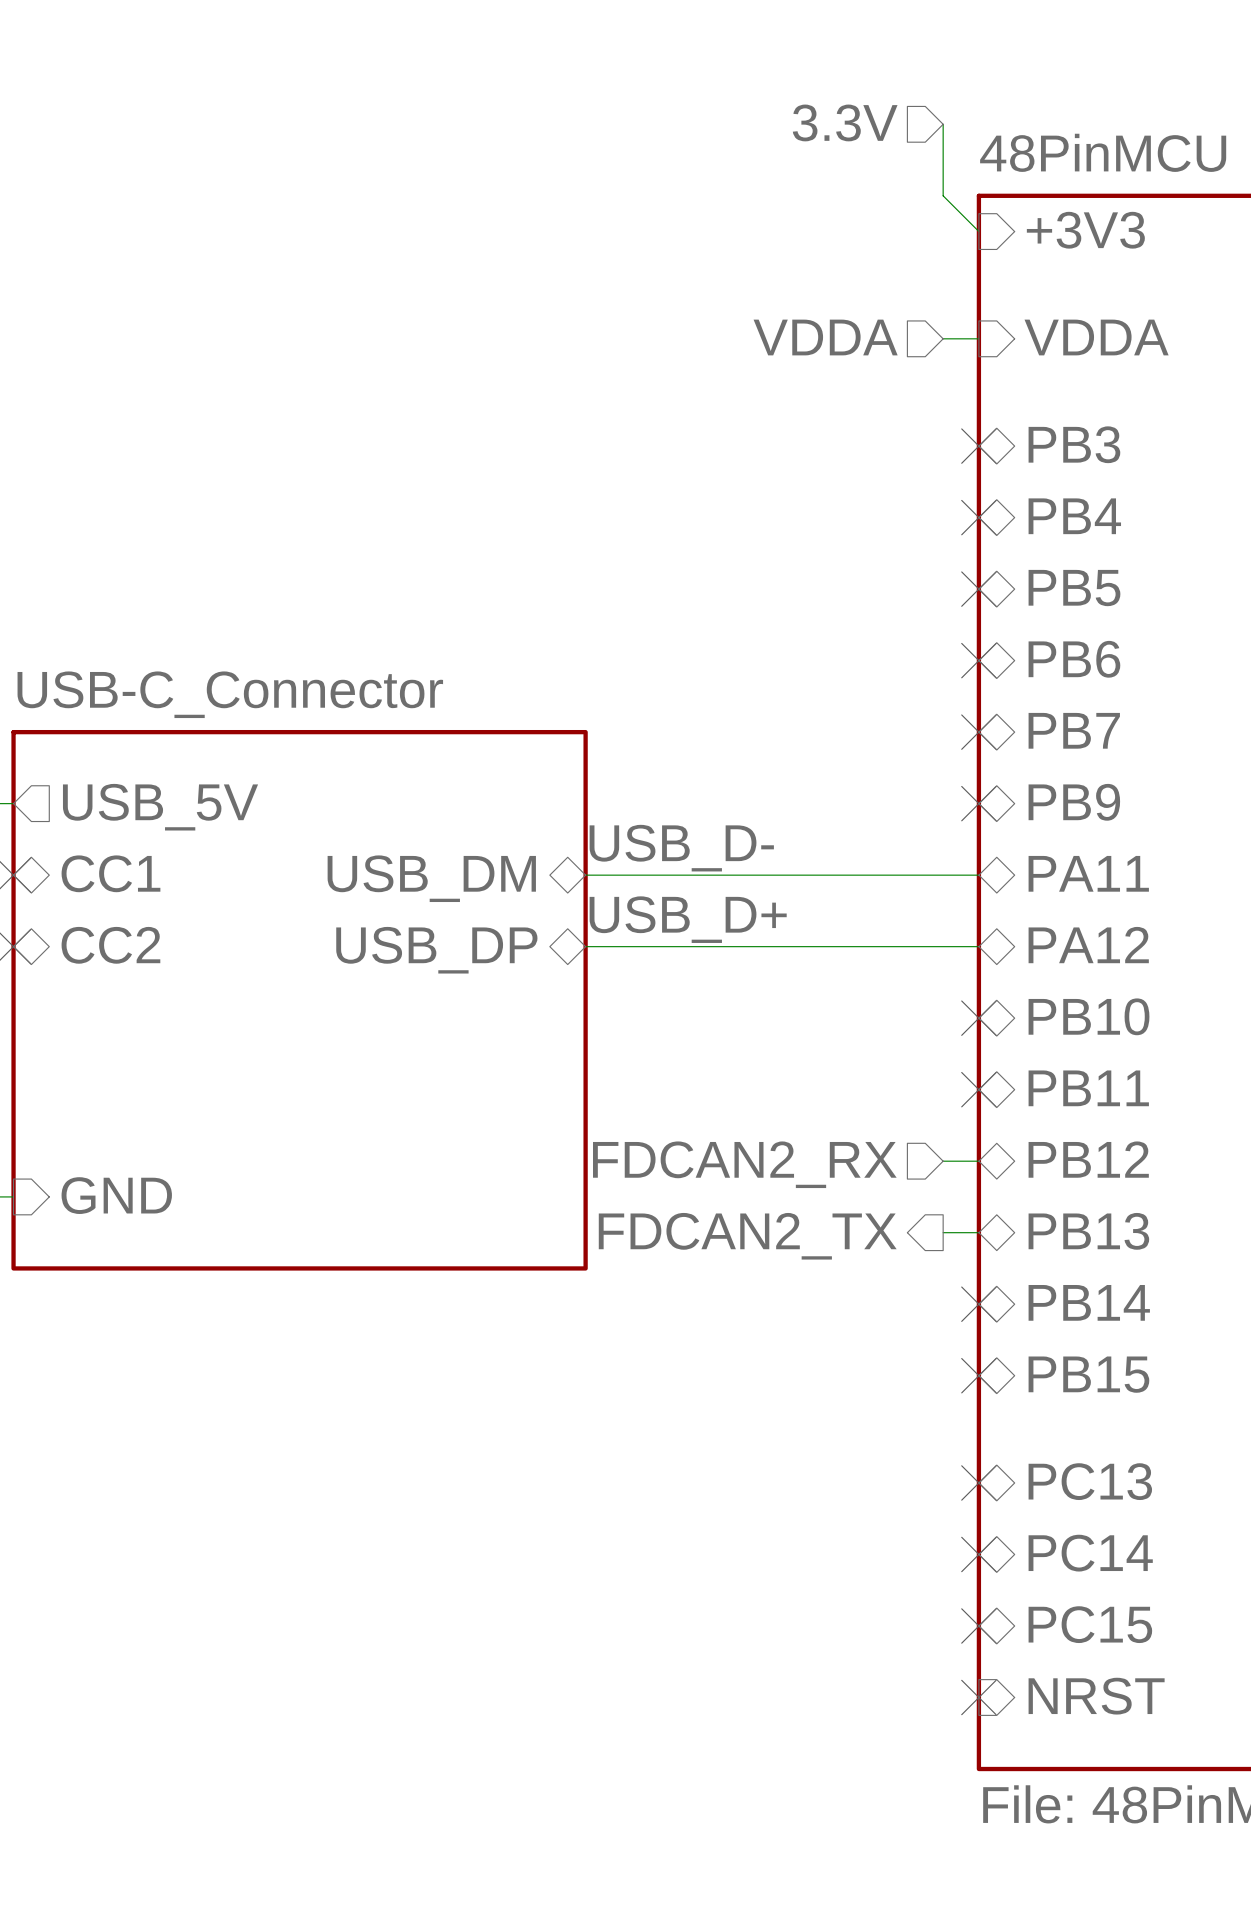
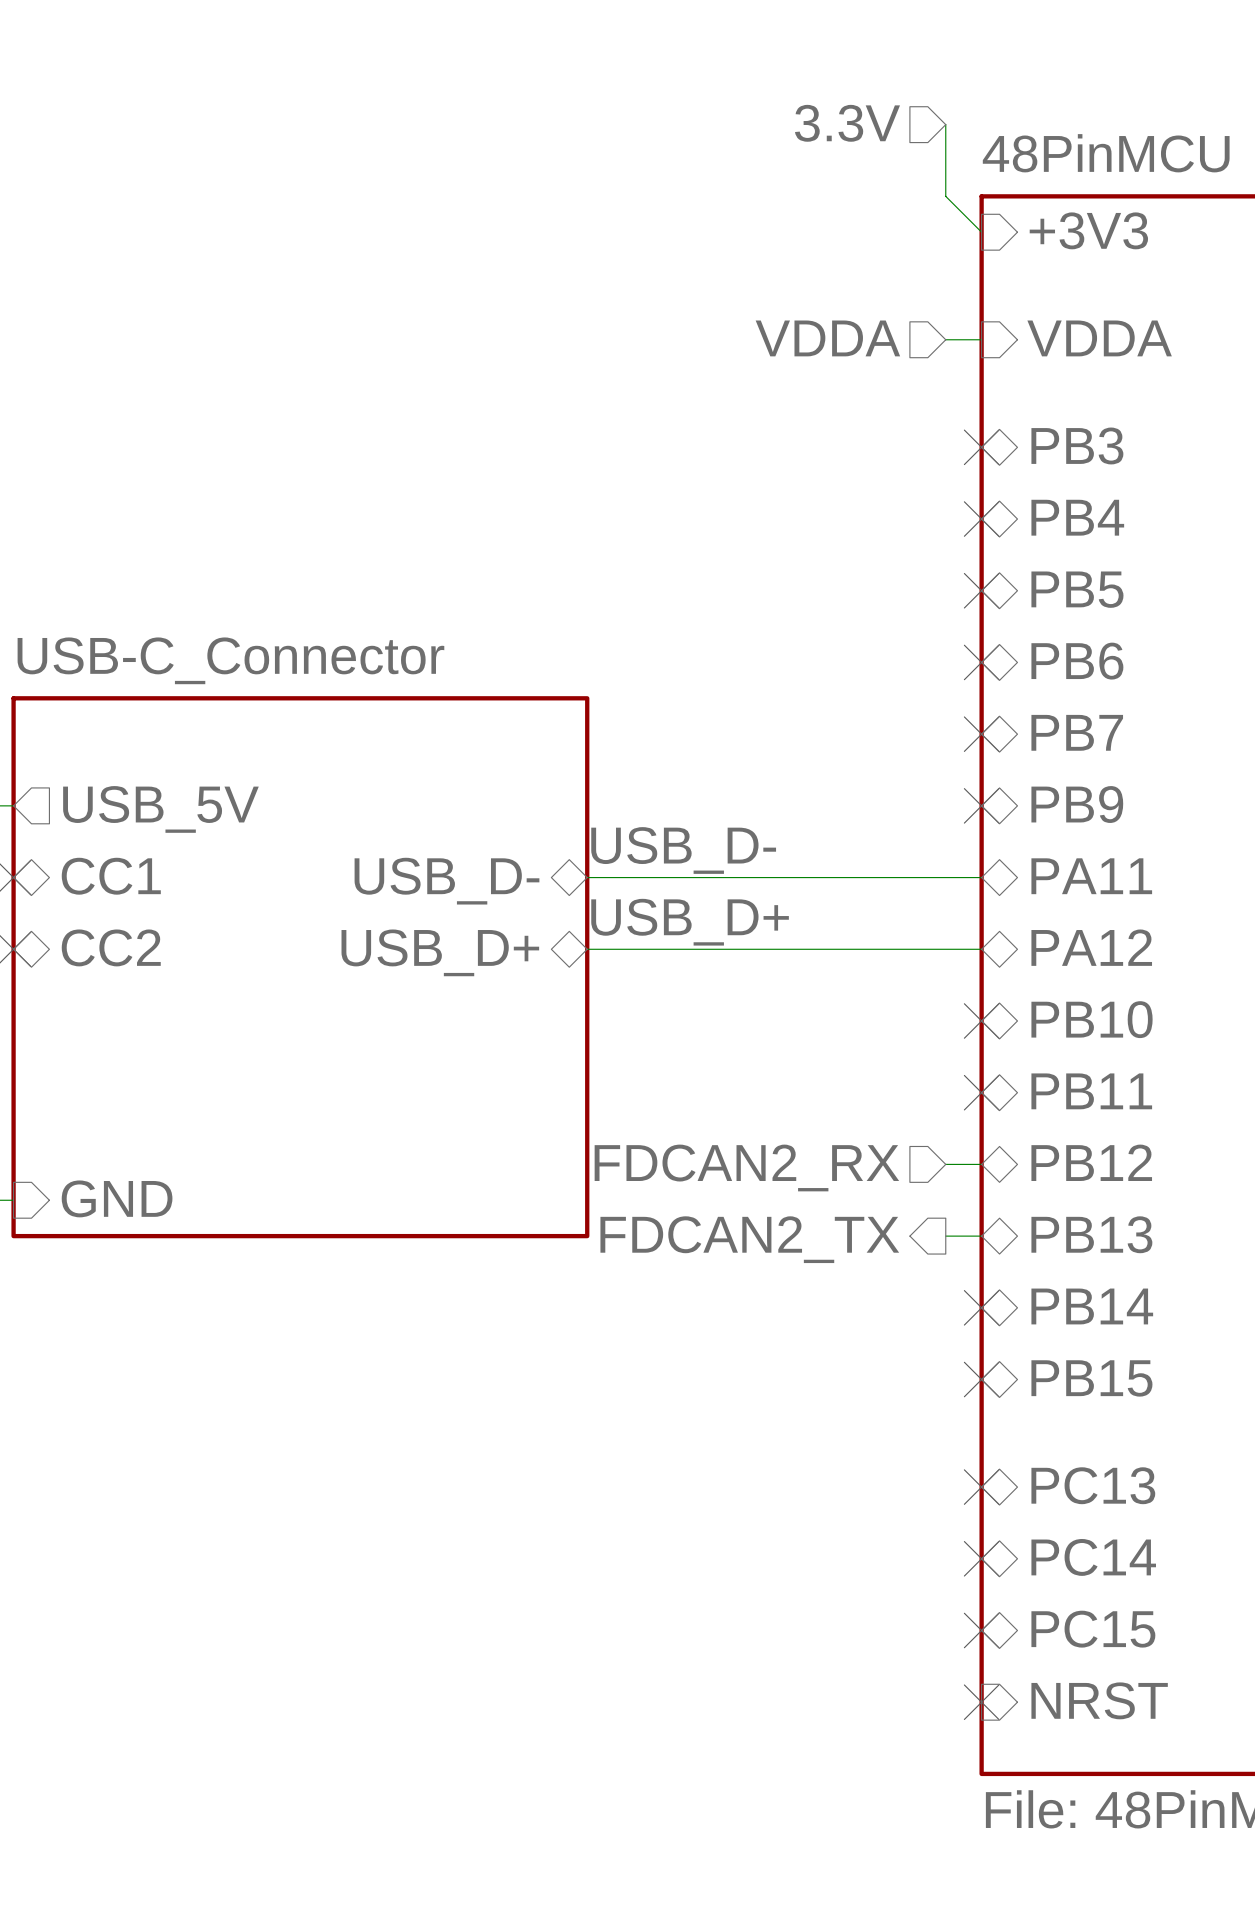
sheet pin: USB_DM (431, 878) -> USB_D- (446, 881)
sheet pin: USB_DP (436, 950) -> USB_D+ (440, 952)
sheet USB-C_Connector position: (299, 1000) -> (300, 967)

